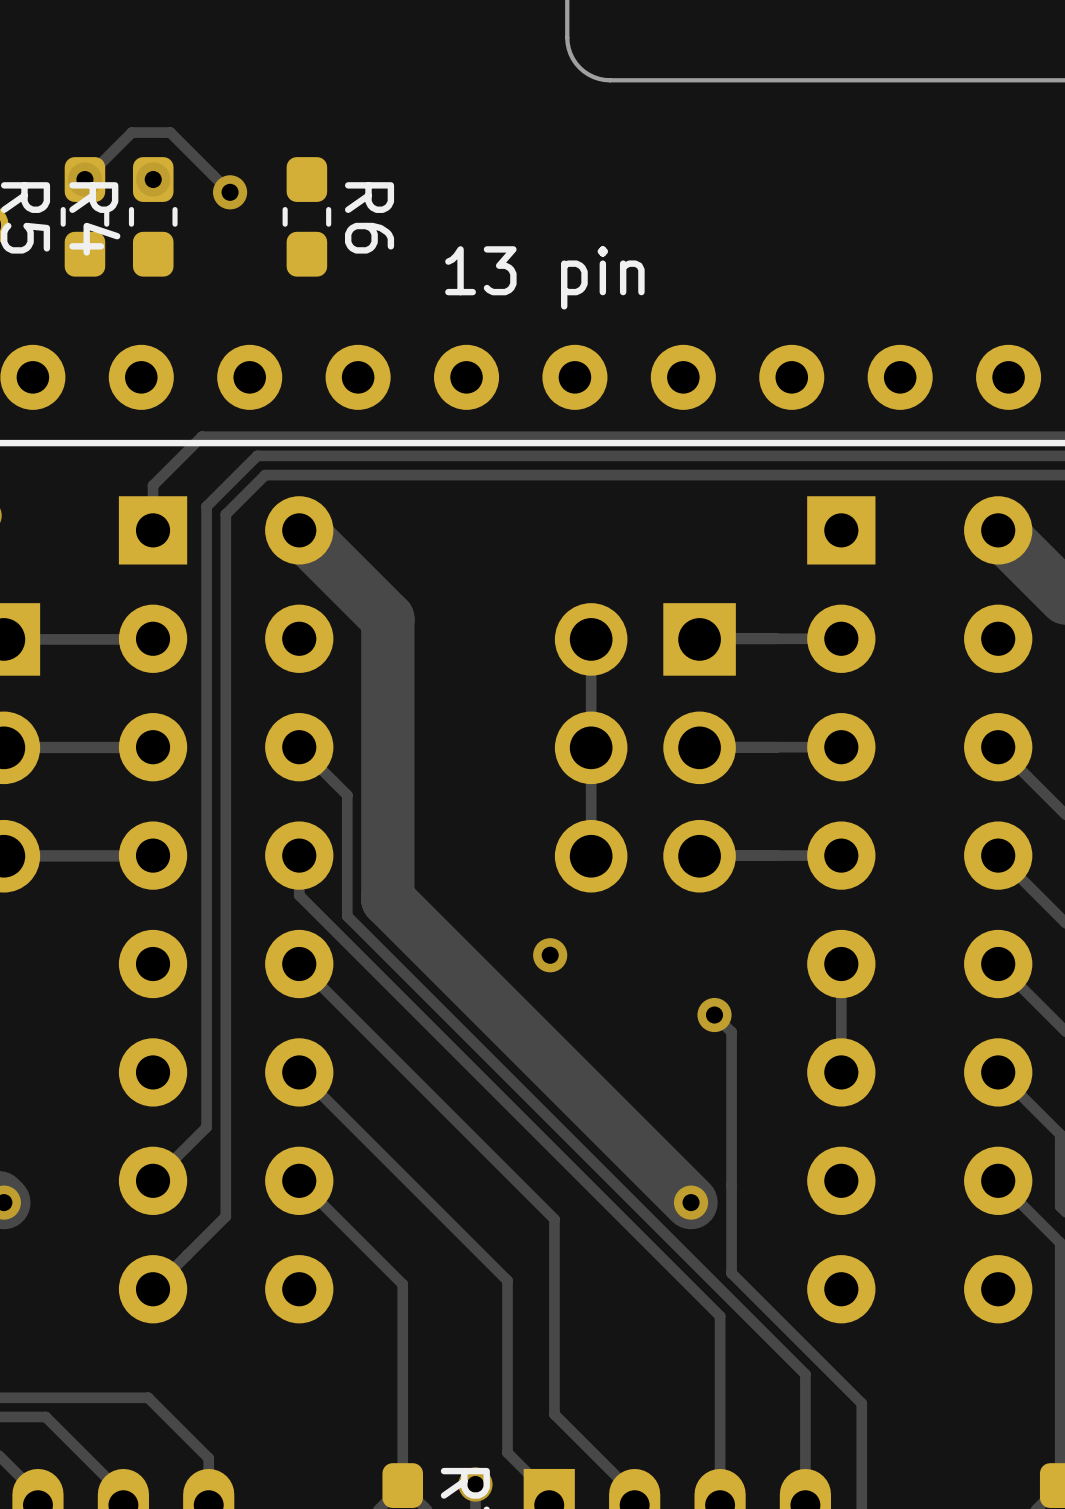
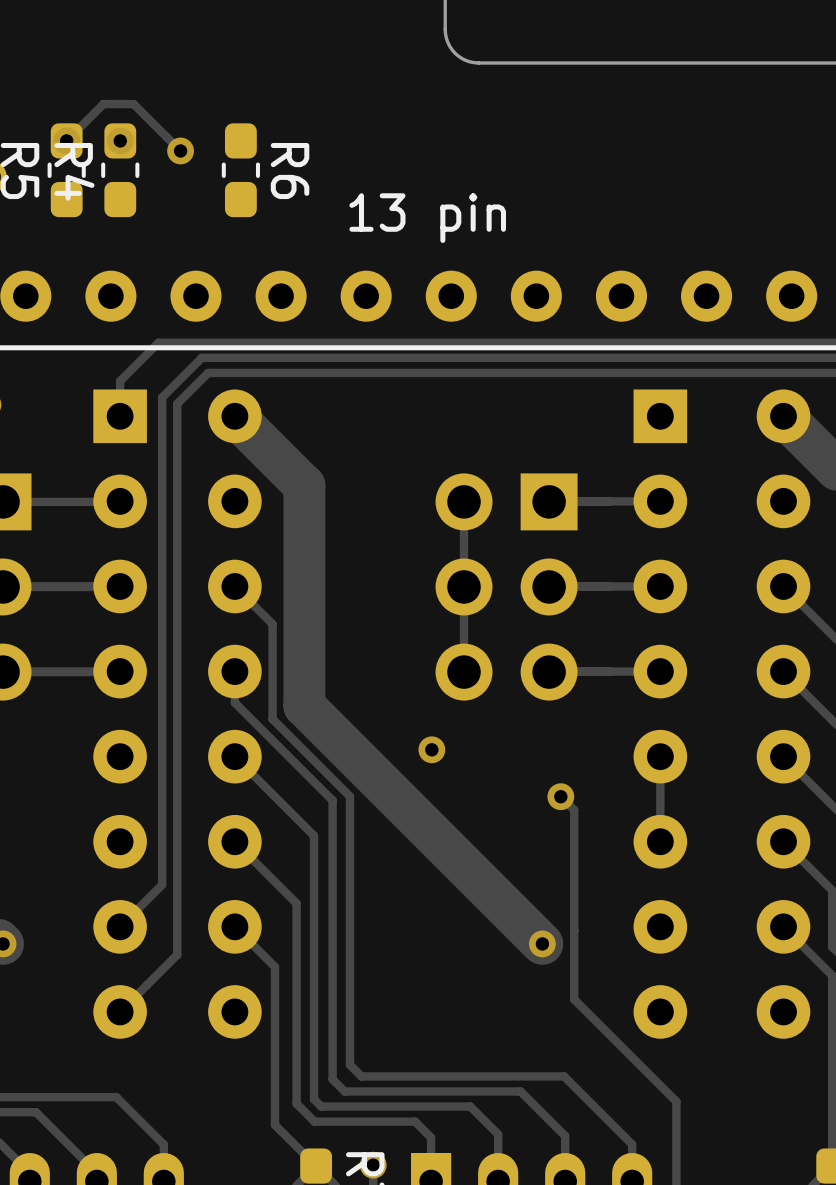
track: (445, 1014) (805, 1374) (805, 1458) -> (349, 796) (349, 1064) (361, 1076) (564, 1076) (632, 1144)
track: (423, 1019) (720, 1316) (720, 1447) -> (332, 800) (332, 1079) (344, 1091) (520, 1091) (565, 1136)
track: (400, 1064) (554, 1219) (554, 1414) (634, 1494) -> (314, 835) (314, 1099) (321, 1106) (470, 1106) (498, 1134) (498, 1173)
track: (377, 1151) (507, 1280) (507, 1452) (549, 1494) -> (296, 903) (296, 1103) (314, 1121) (415, 1121) (431, 1137) (431, 1173)
track: (350, 1231) (402, 1284) (402, 1485) -> (274, 966) (274, 1124) (316, 1166)

